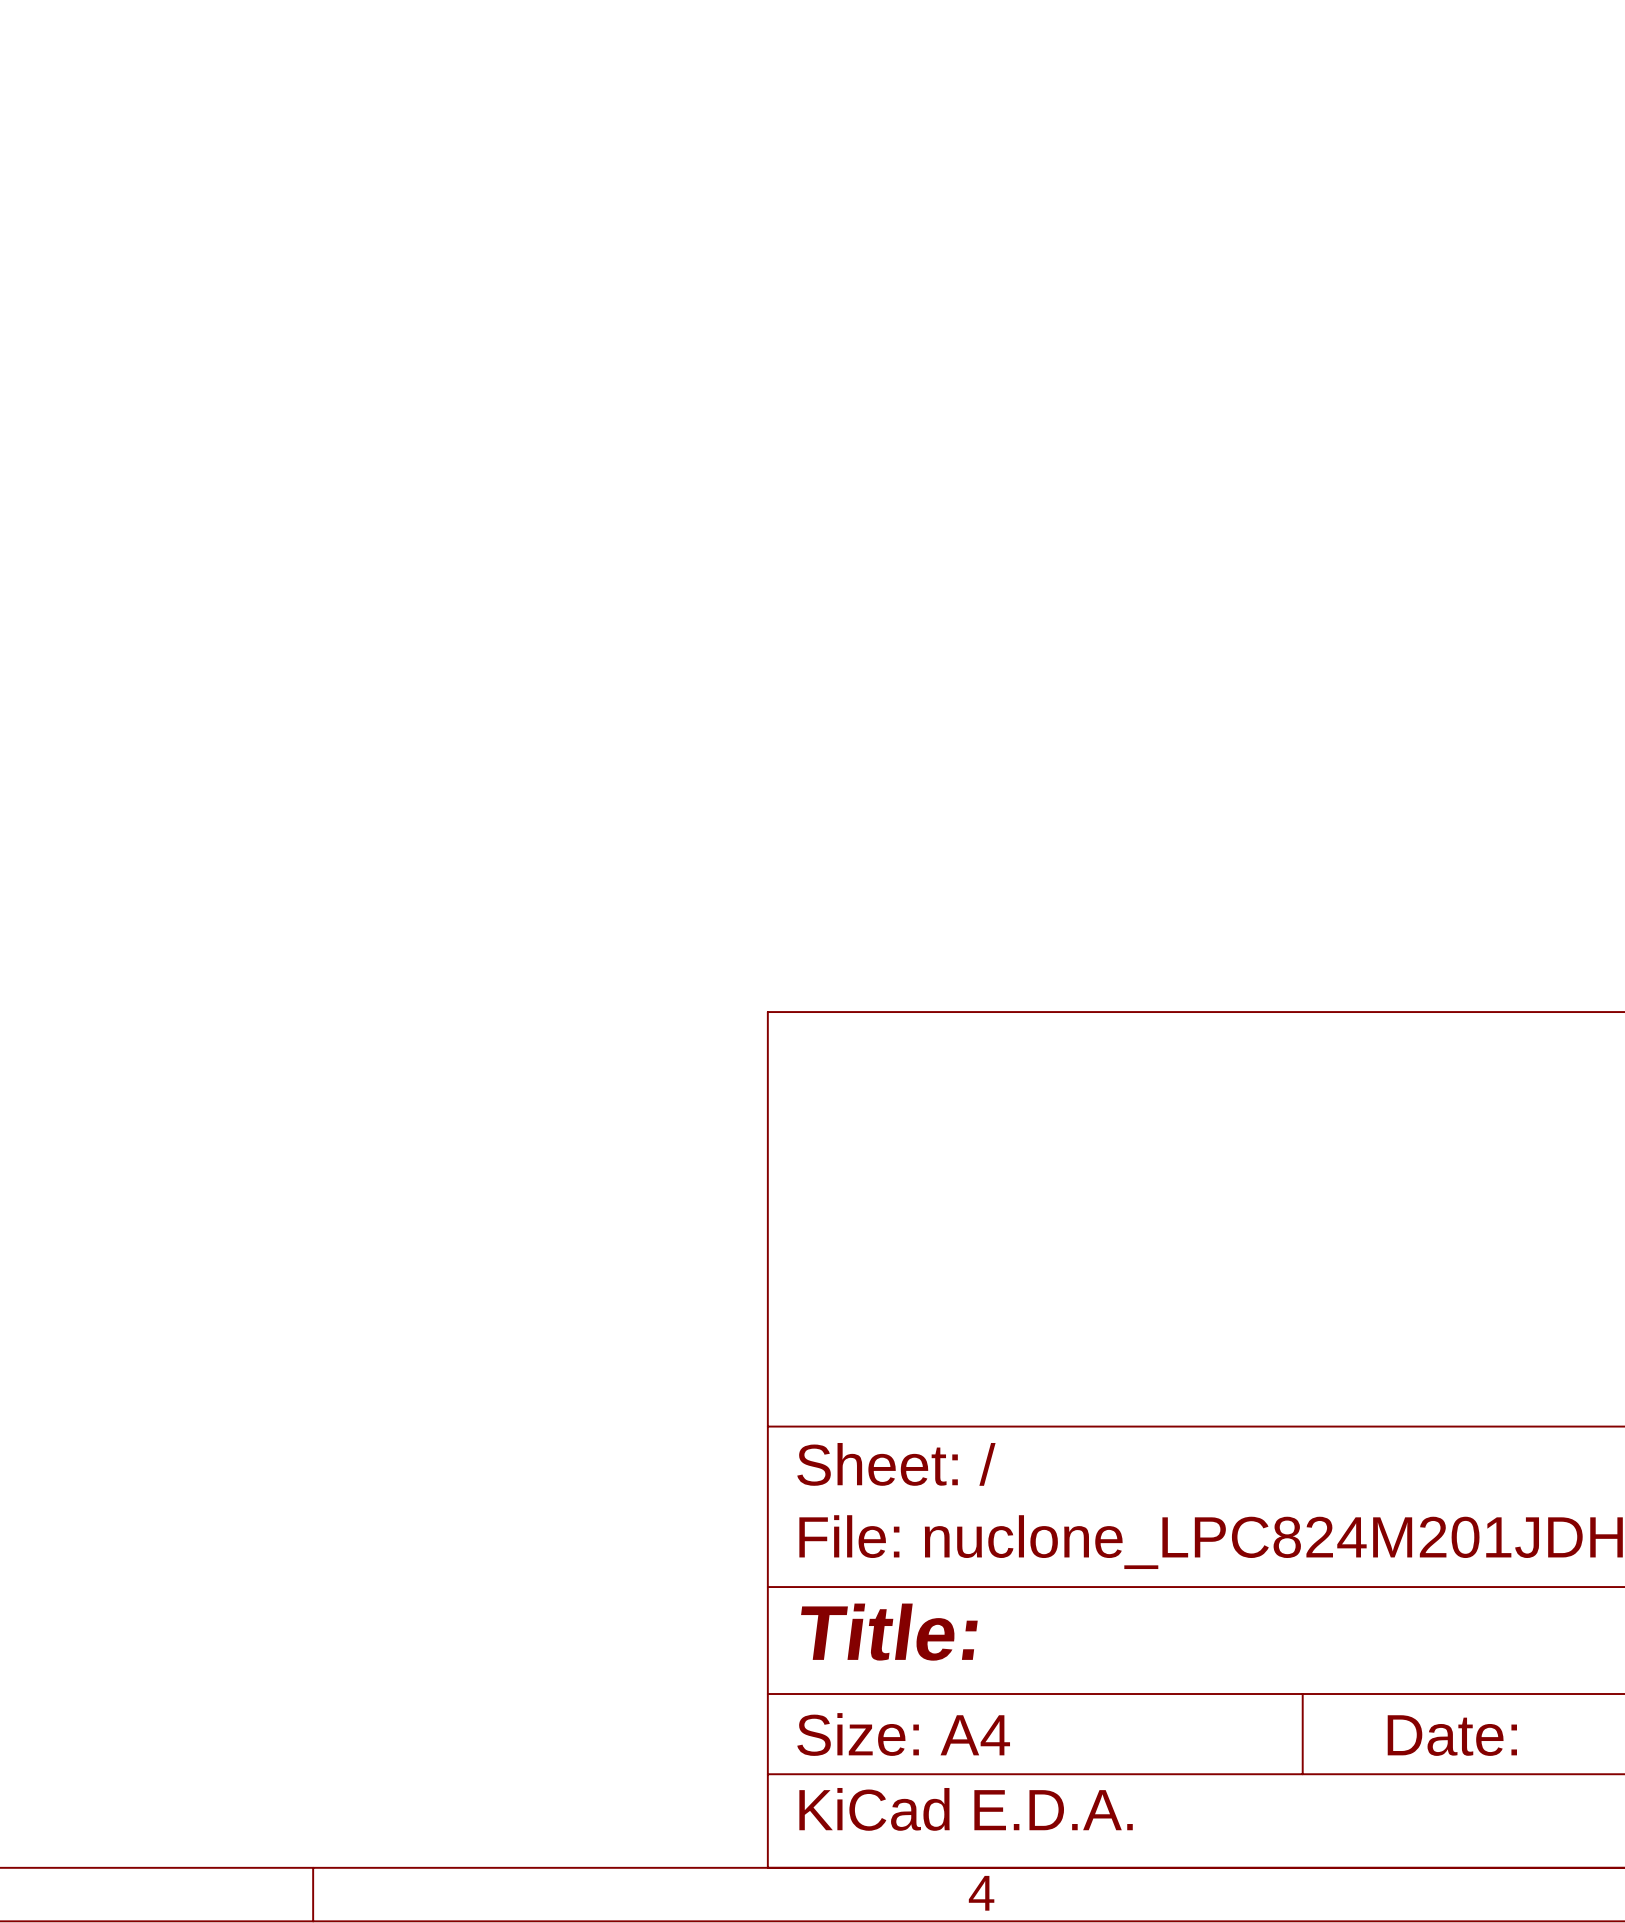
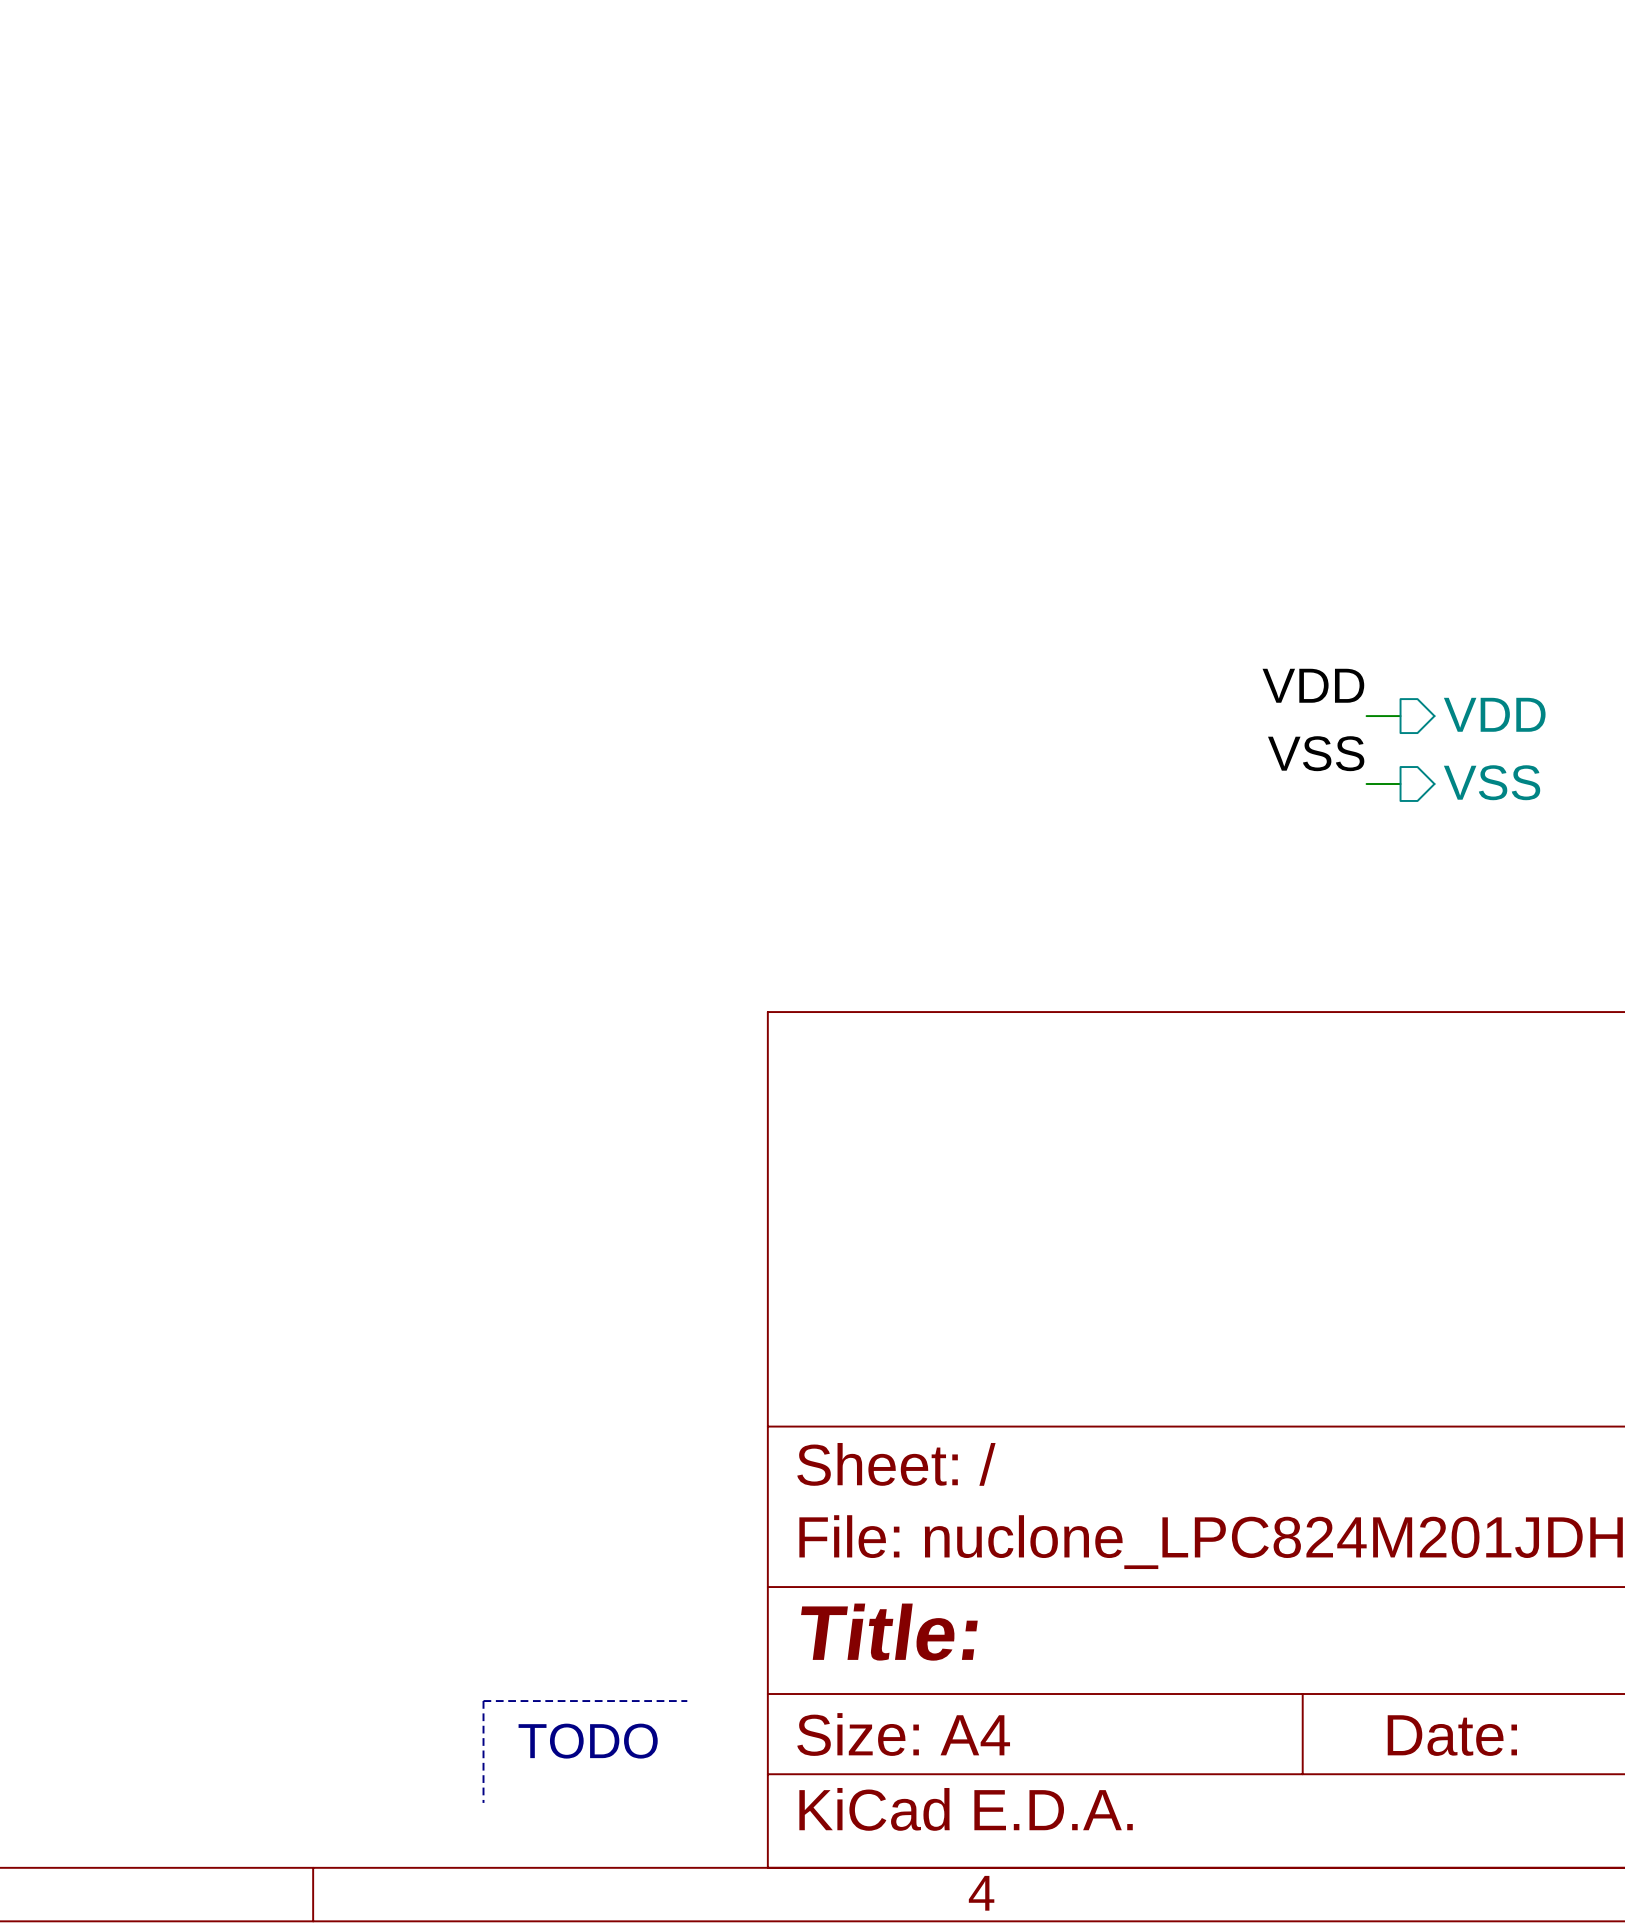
label: none -> VDD (1313, 685)
sheet pin: none -> VDD (1494, 714)
wire: none -> (1366, 716) (1400, 716)
label: none -> VSS (1316, 753)
sheet pin: none -> VSS (1492, 782)
wire: none -> (1366, 784) (1400, 784)
line: none -> (687, 1701) (483, 1701) (483, 1802)
text: none -> TODO (588, 1741)

